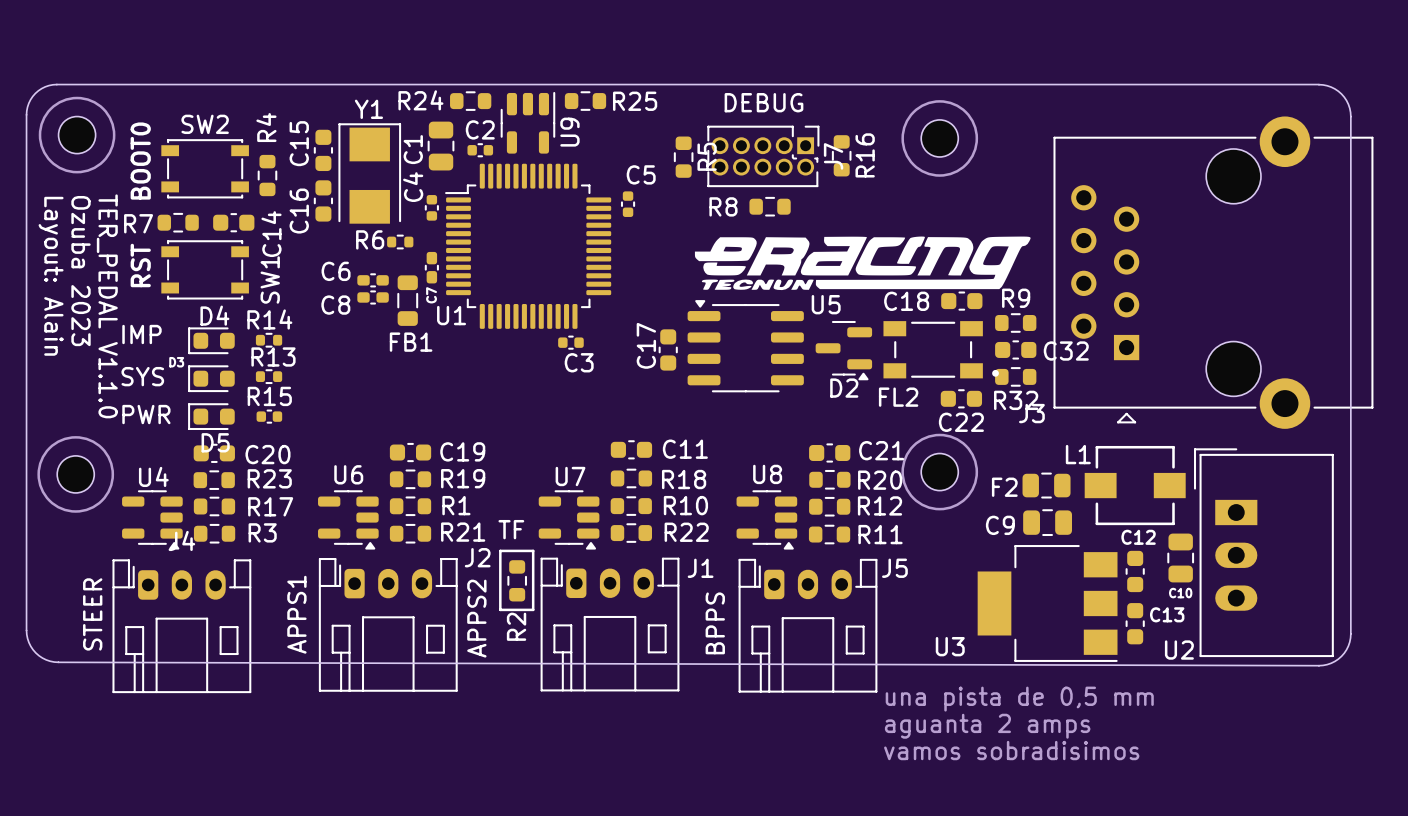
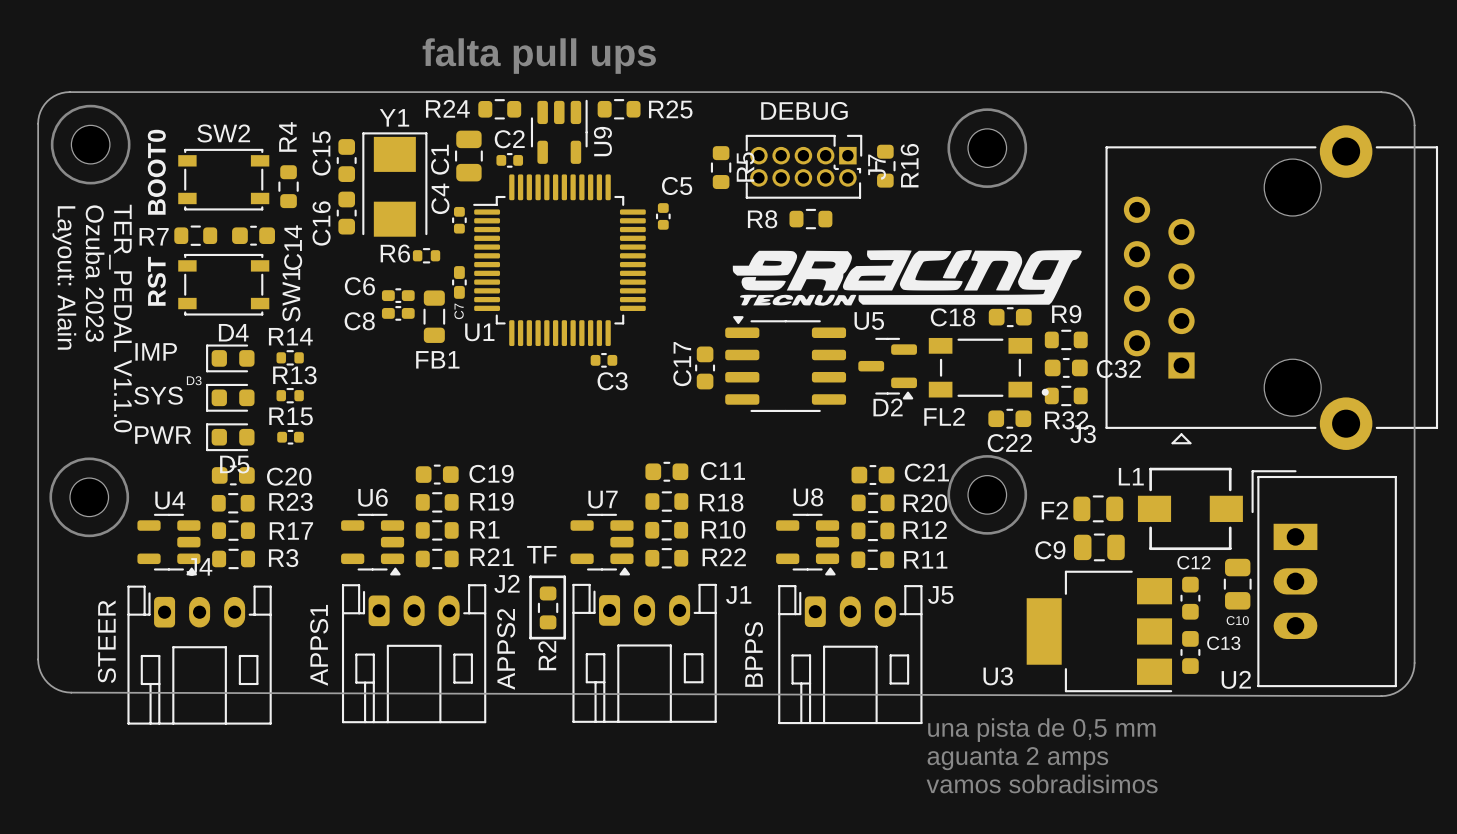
text: none -> falta pull ups (539, 56)

